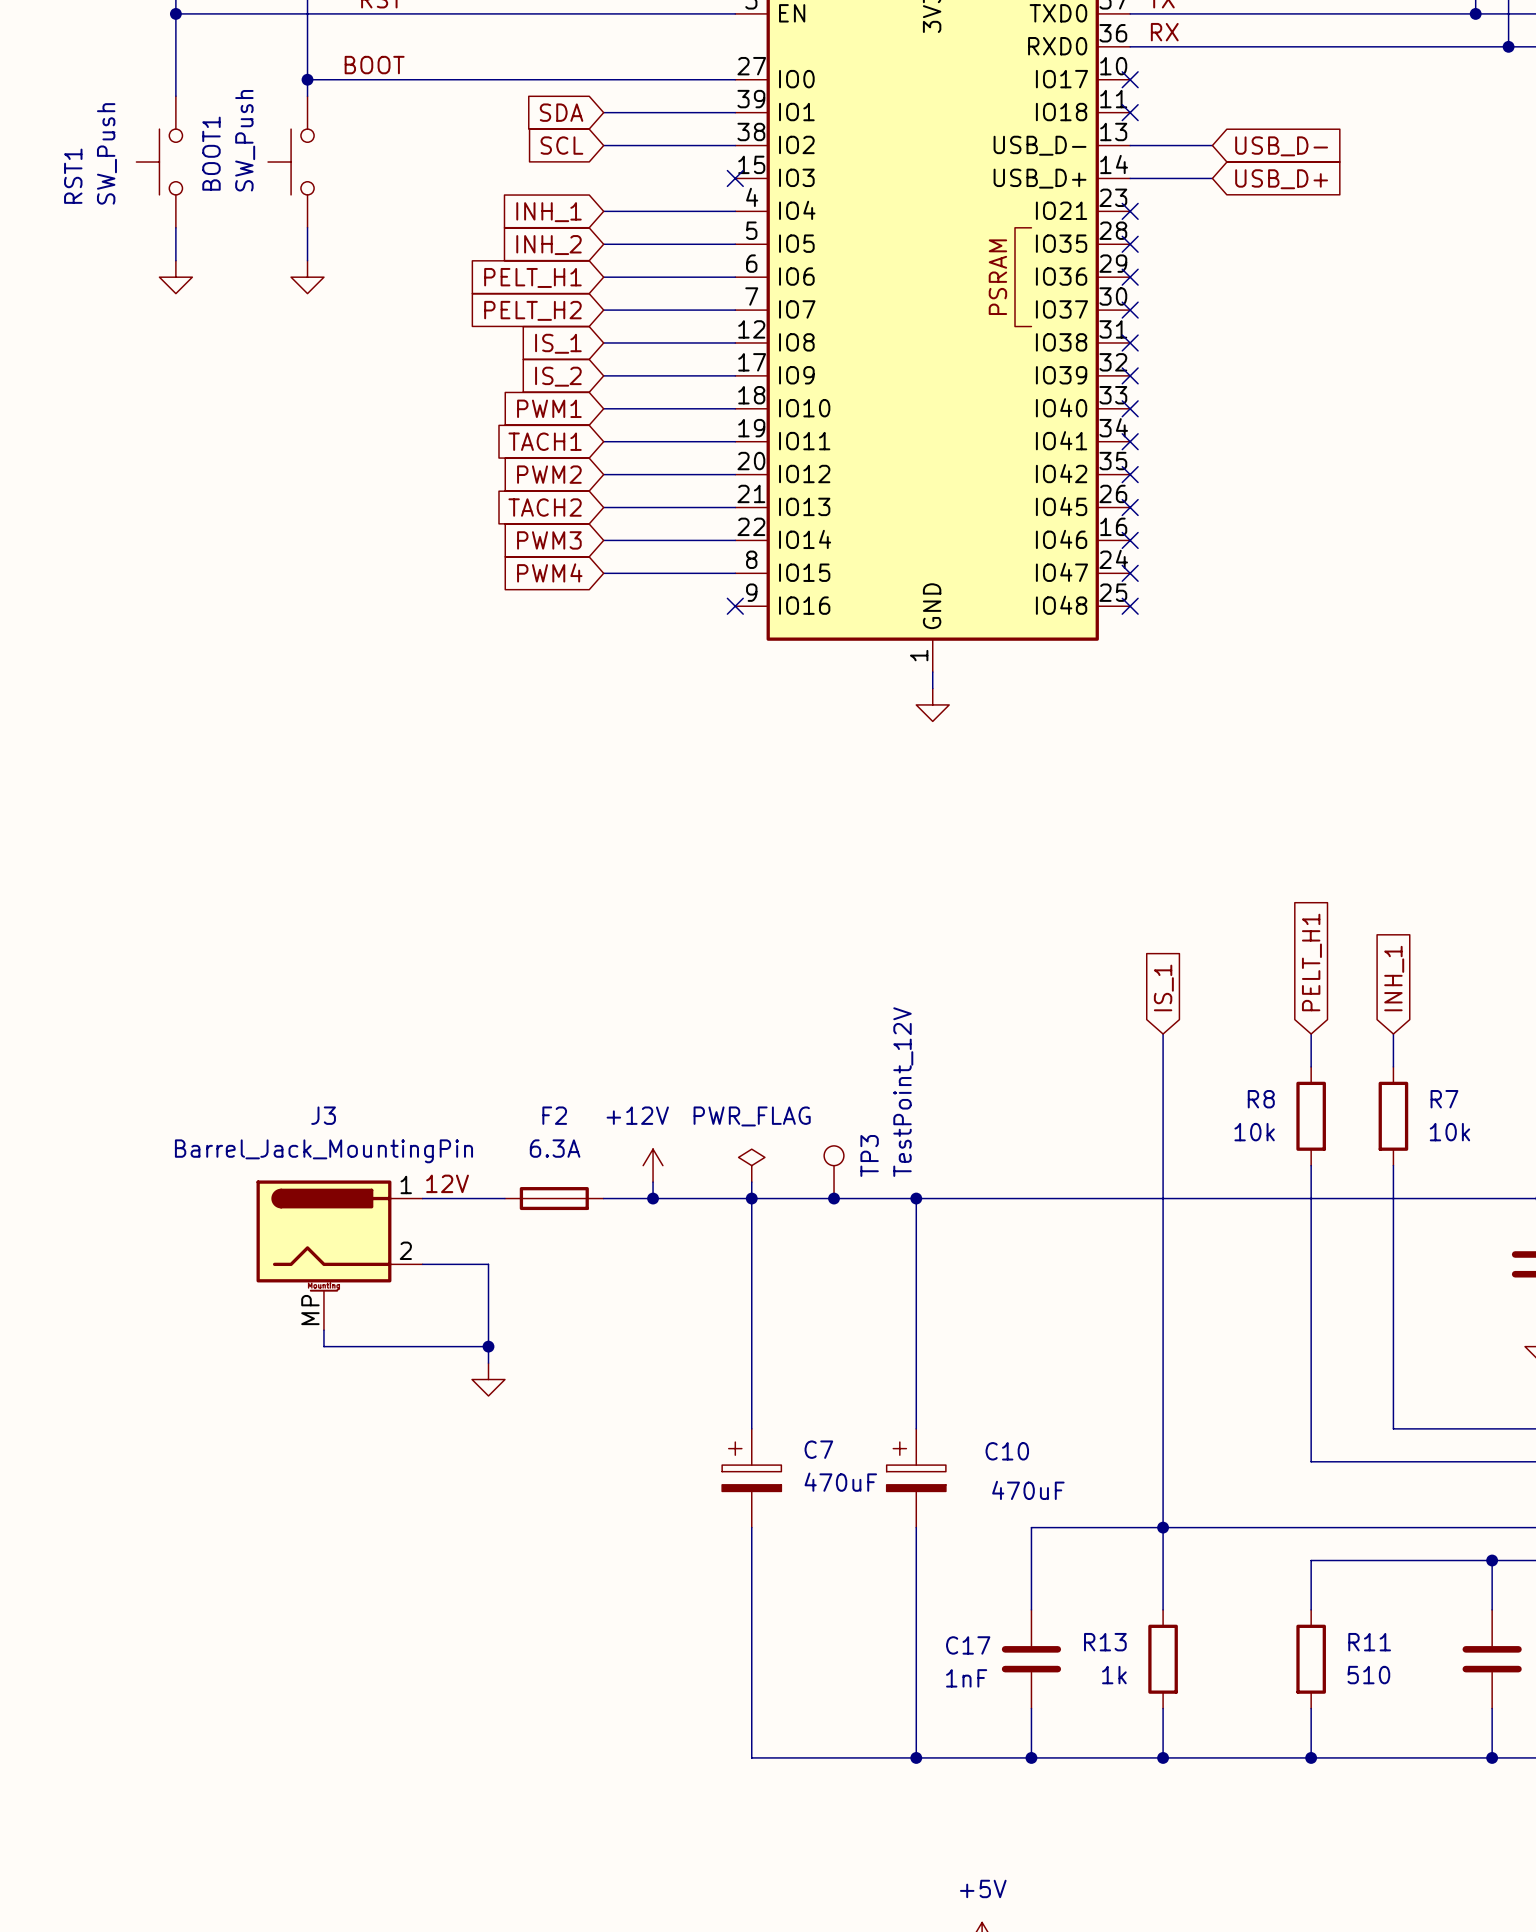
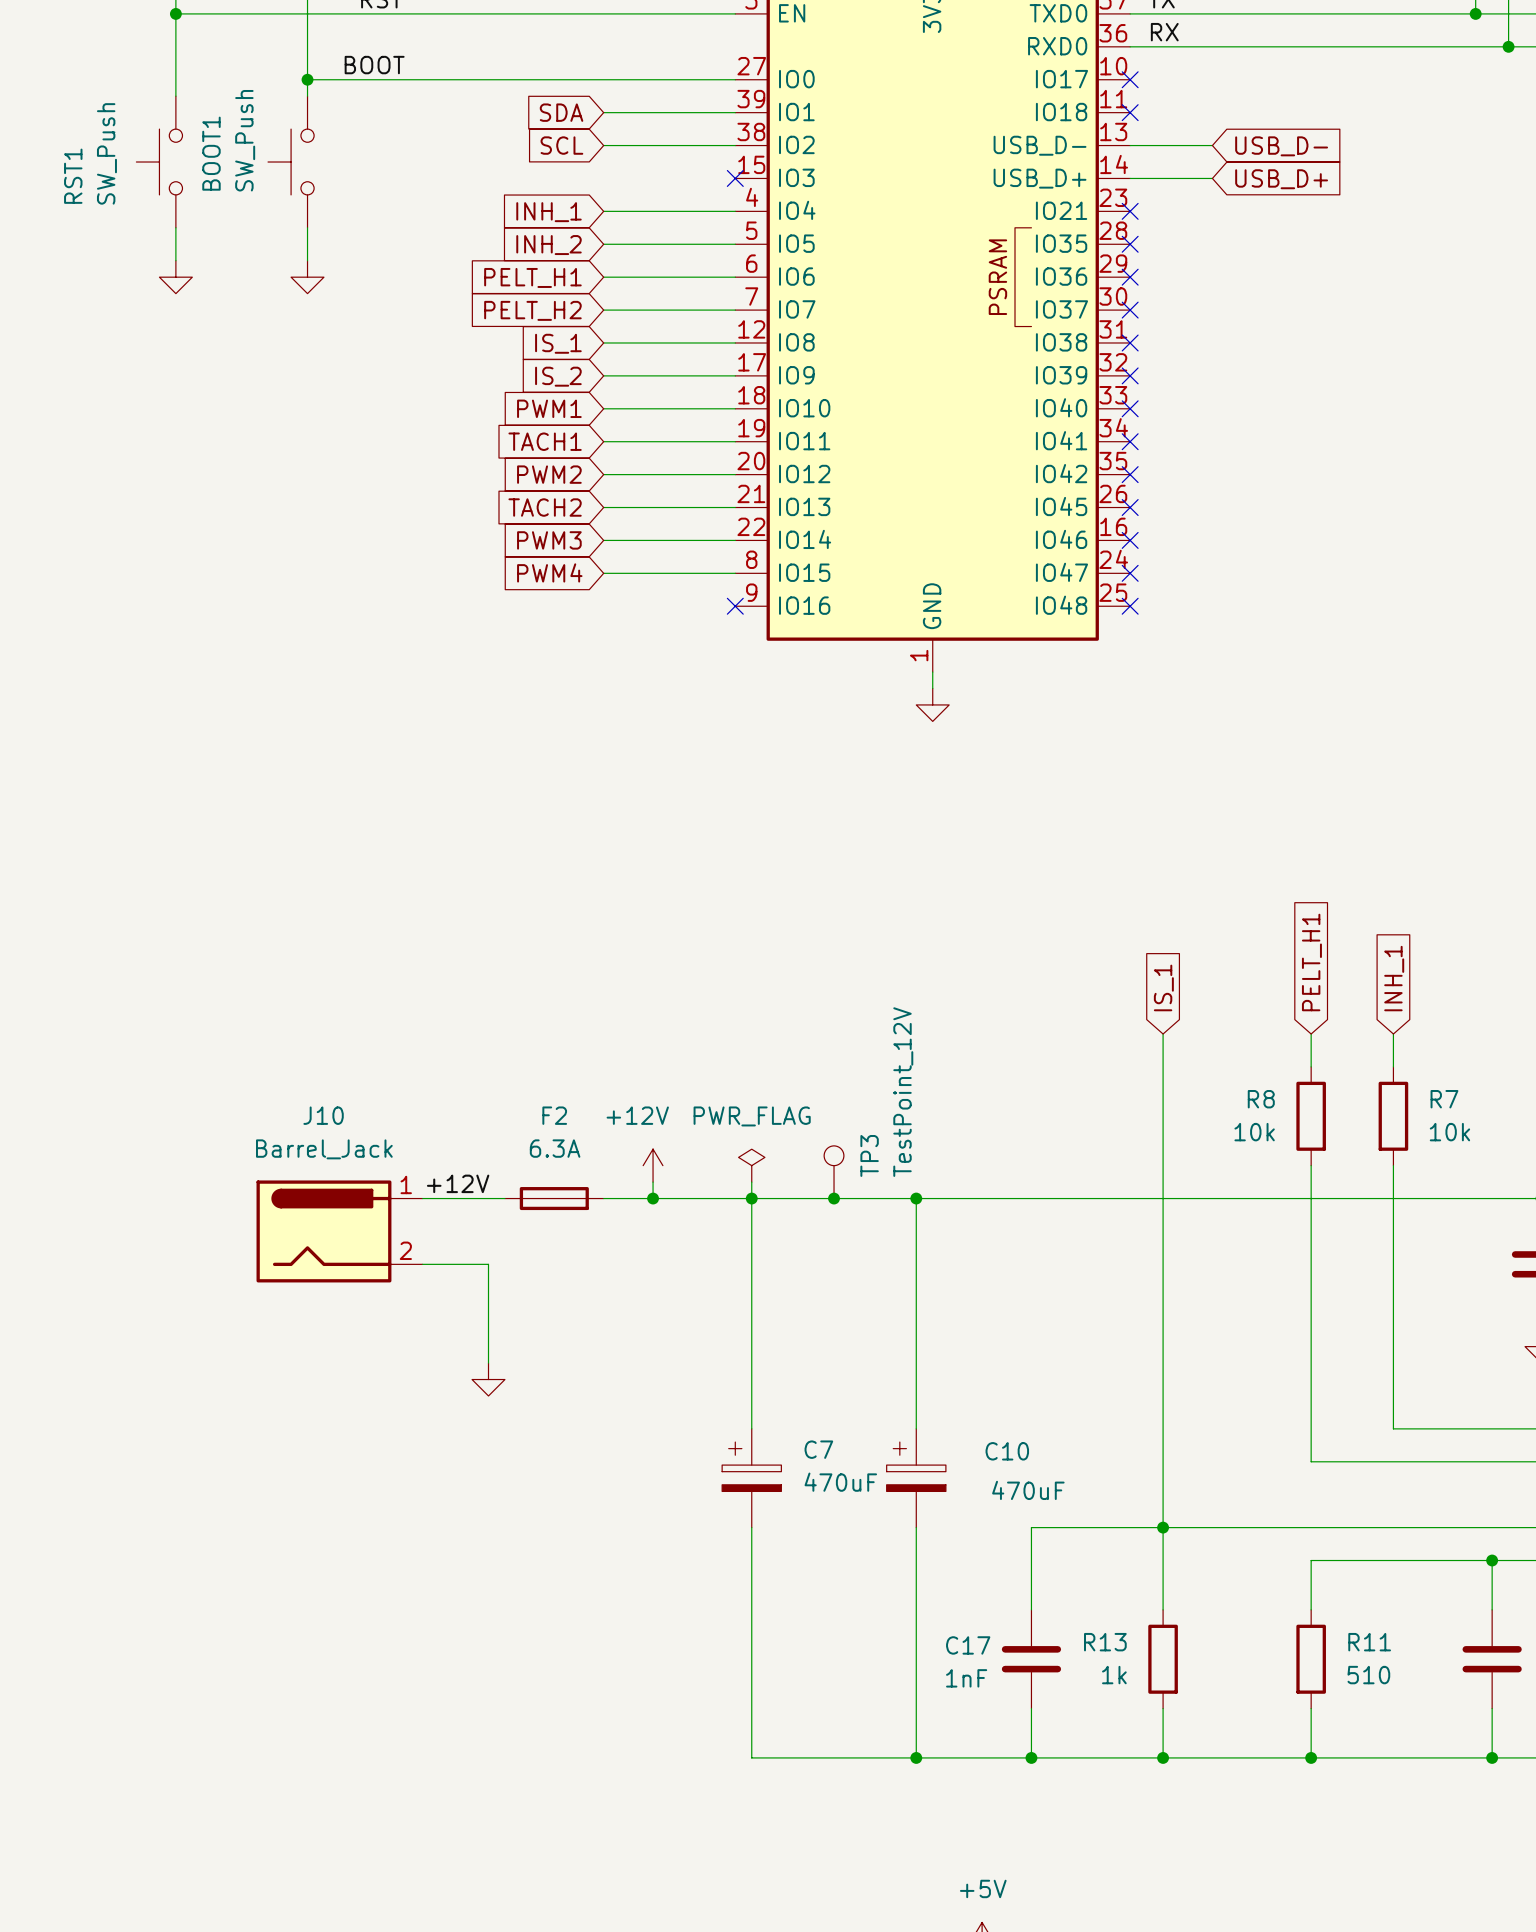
label: 12V (447, 1183) -> +12V (458, 1183)
J10: none -> Barrel_Jack (339, 1231)
J3: Barrel_Jack_MountingPin (339, 1255) -> none
wire: (323, 1330) (323, 1346) (488, 1346) -> none
junction: (488, 1346) -> none

